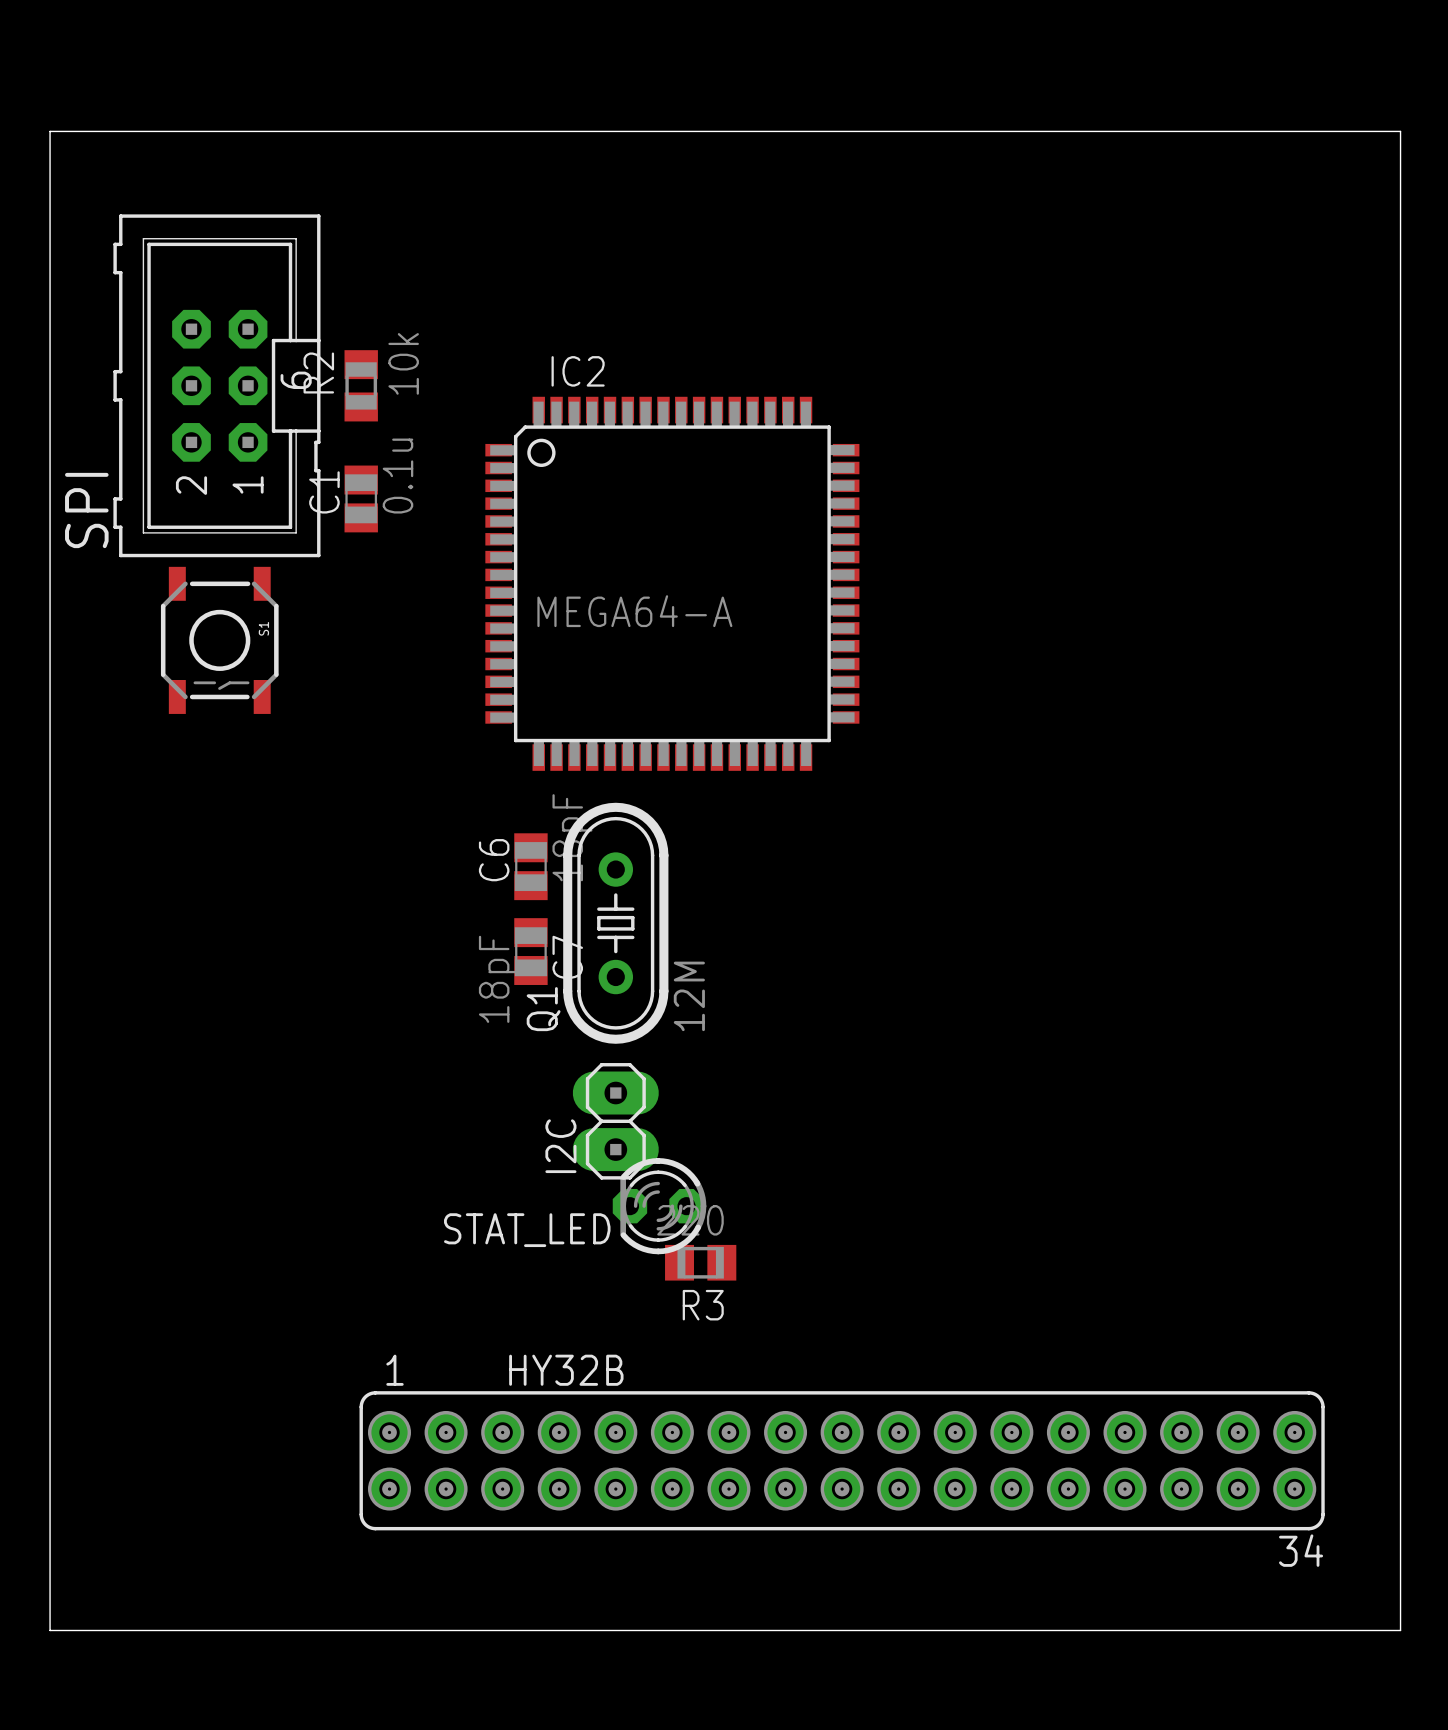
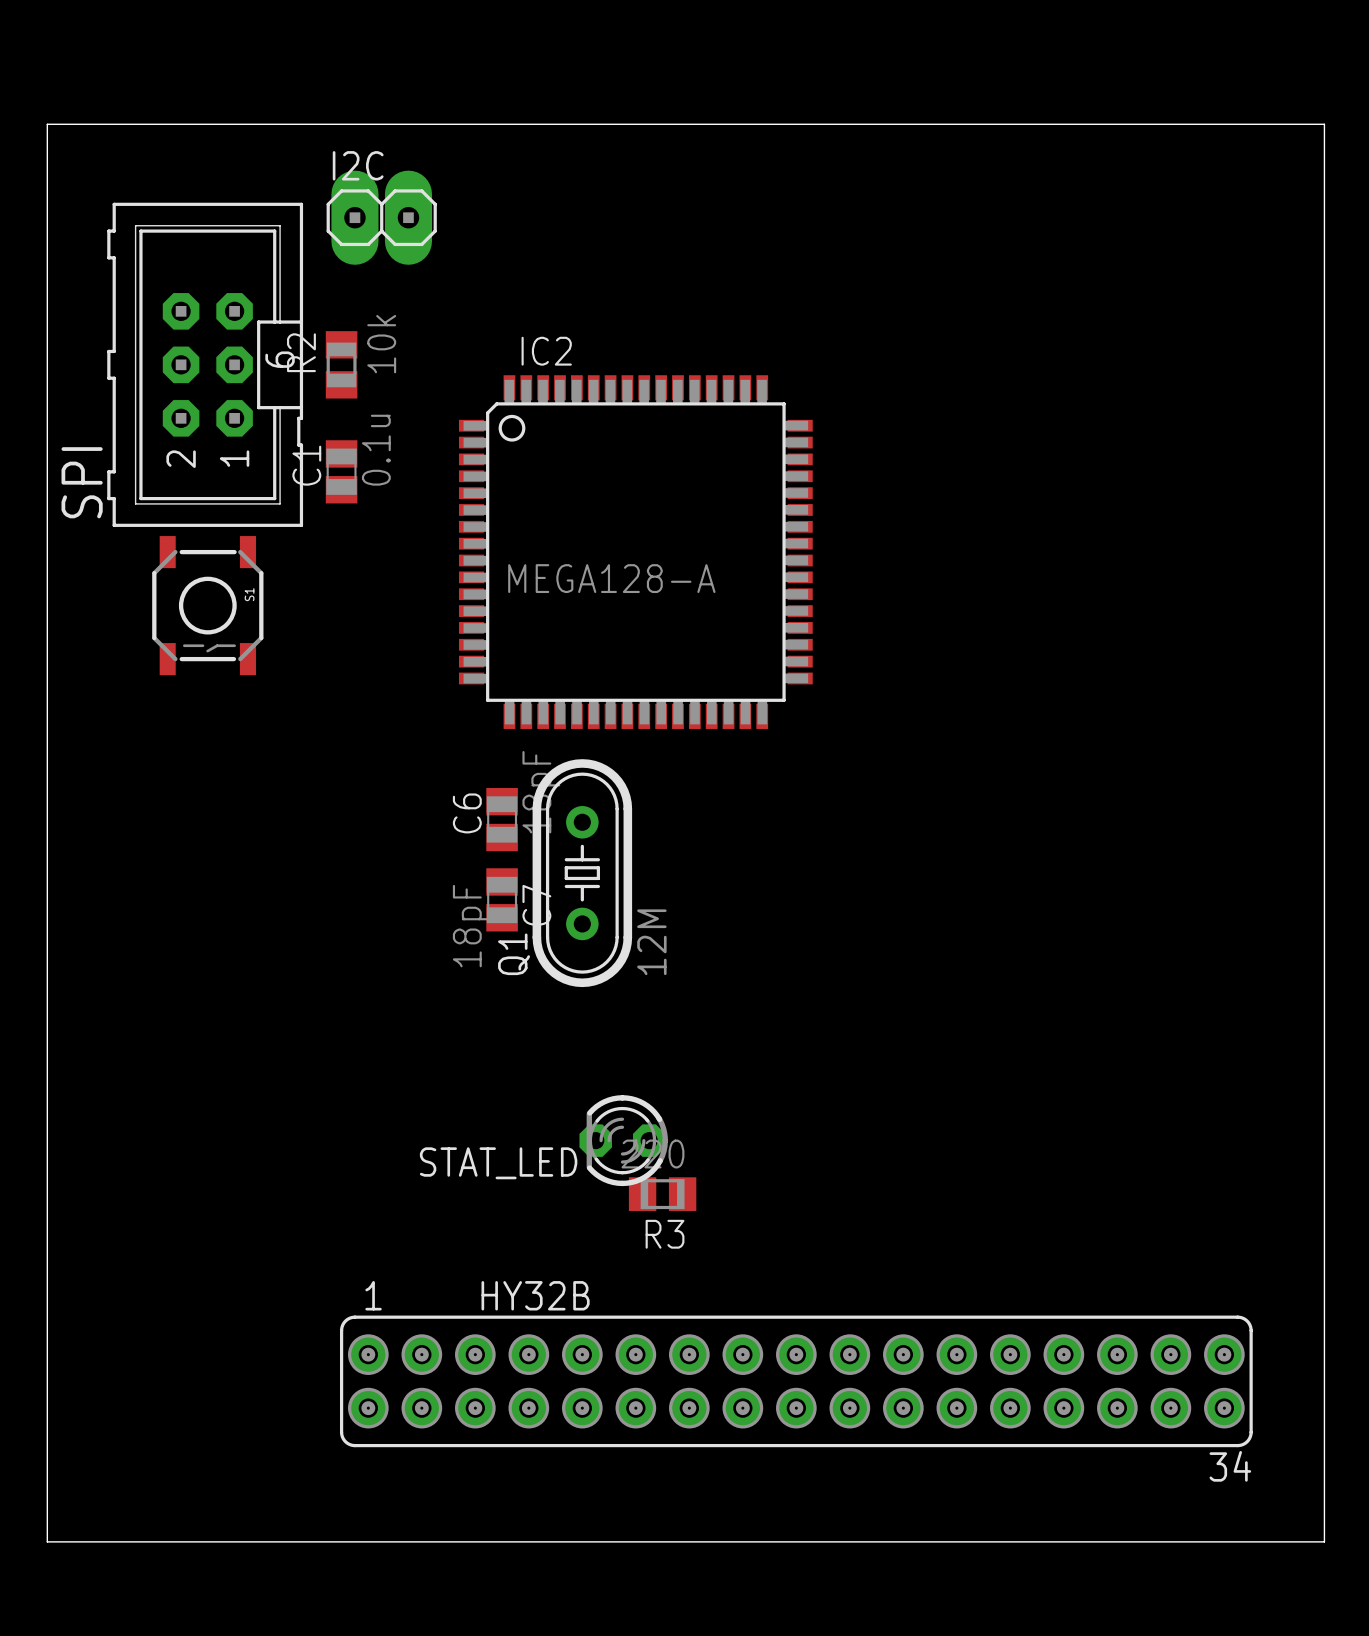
IC2 value: MEGA64-A (634, 611) -> MEGA128-A (611, 578)
I2C footprint: [572, 1063, 659, 1180] -> [326, 170, 437, 265]
I2C name position: I2C (560, 1146) -> I2C (358, 165)

